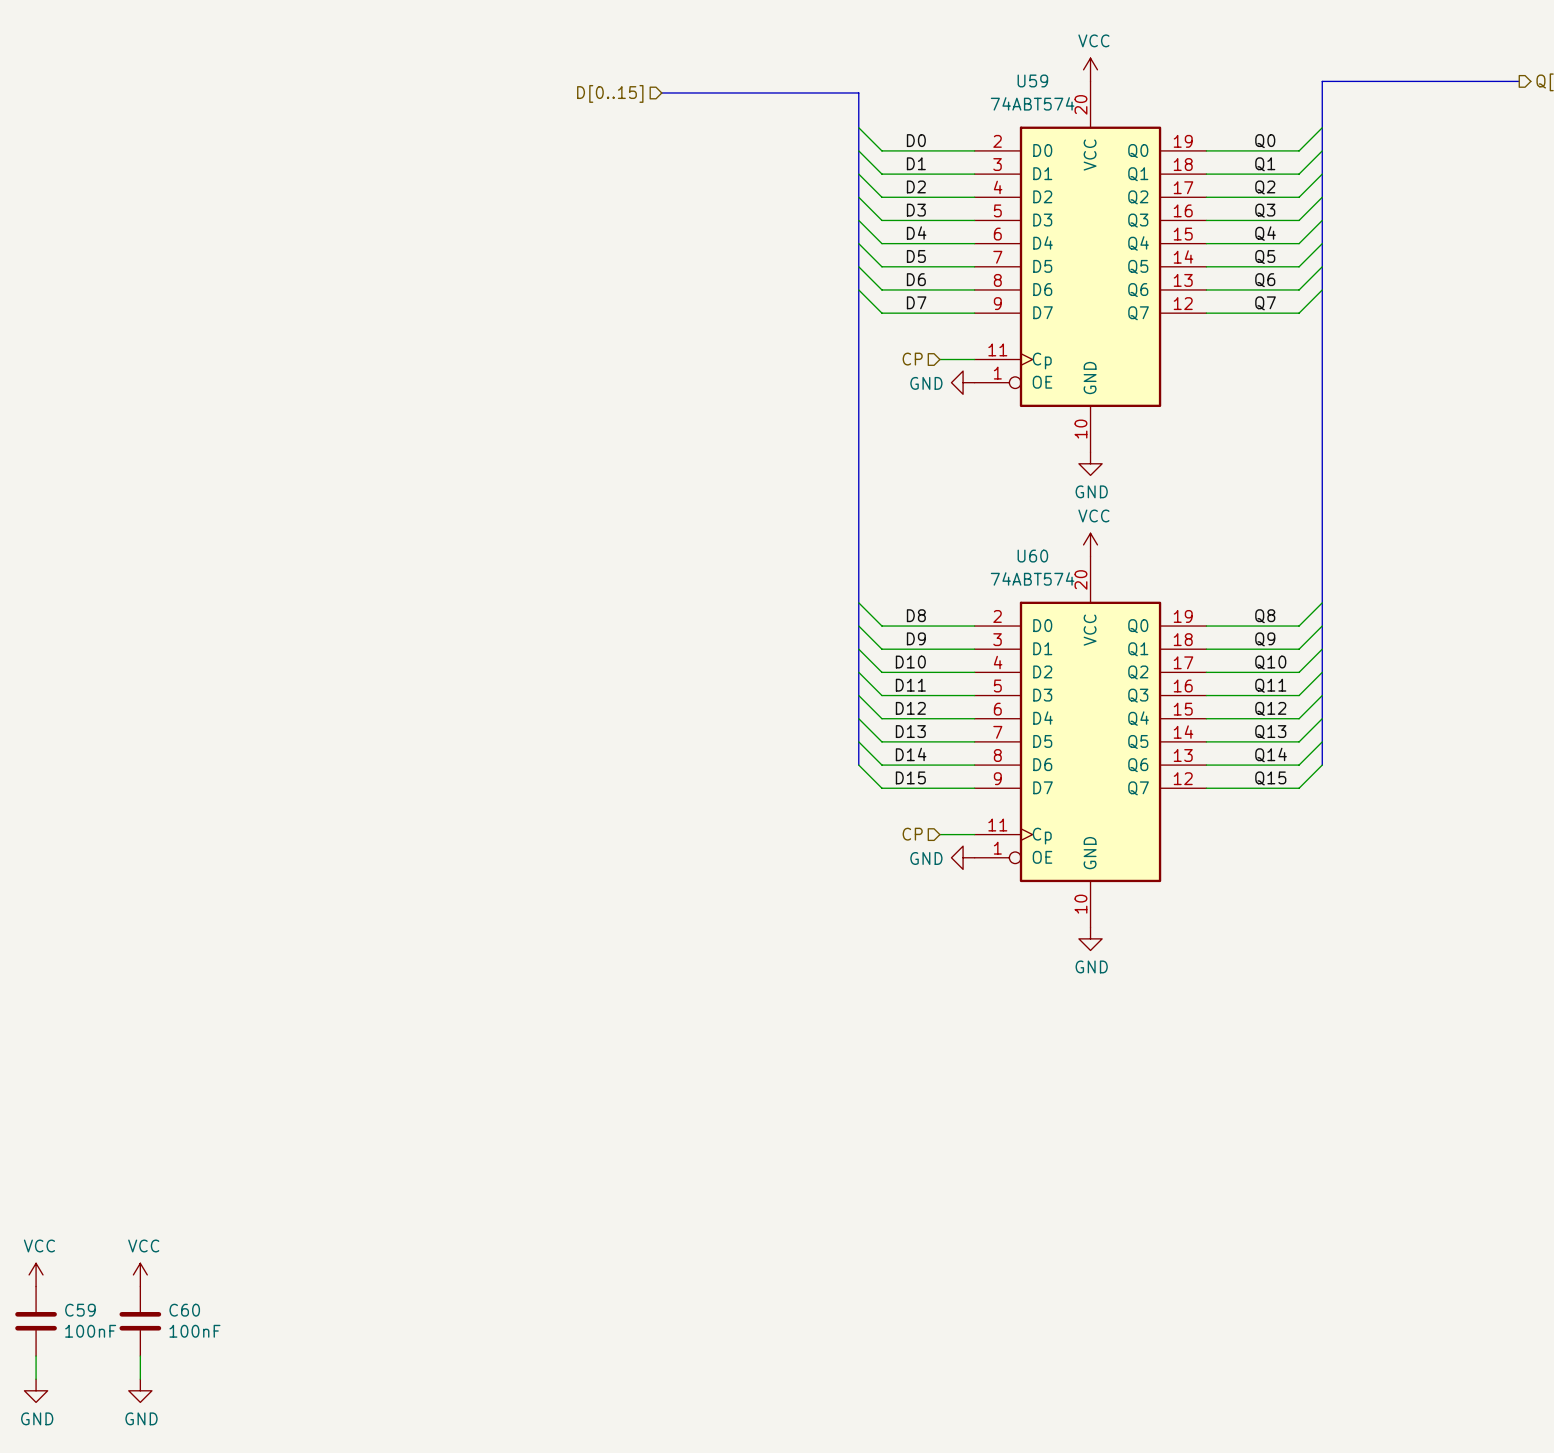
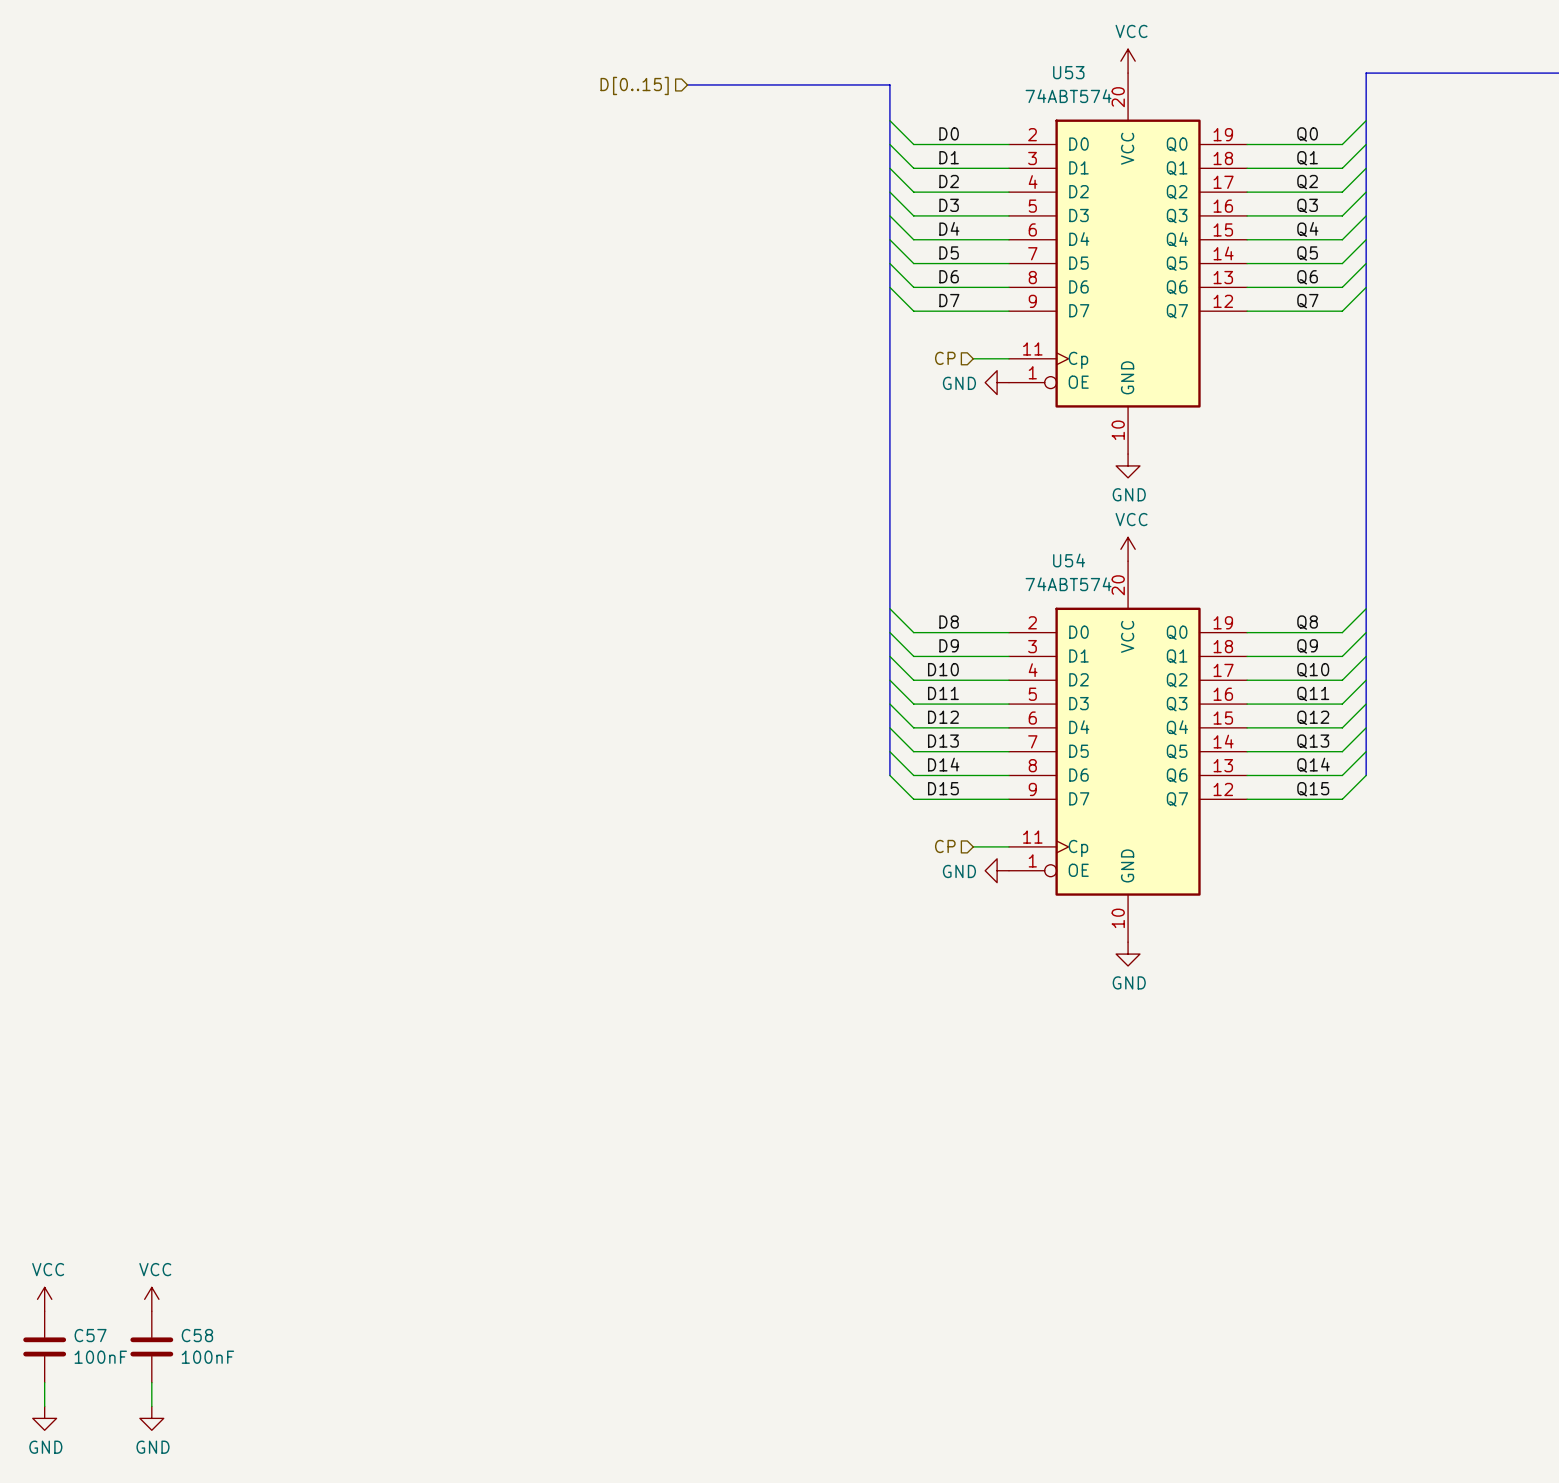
U59 name: U59 (1032, 80) -> U53 (1068, 72)
U60 name: U60 (1032, 556) -> U54 (1069, 560)
C59 name: C59 (80, 1310) -> C57 (90, 1335)
C60 name: C60 (184, 1310) -> C58 (197, 1335)

